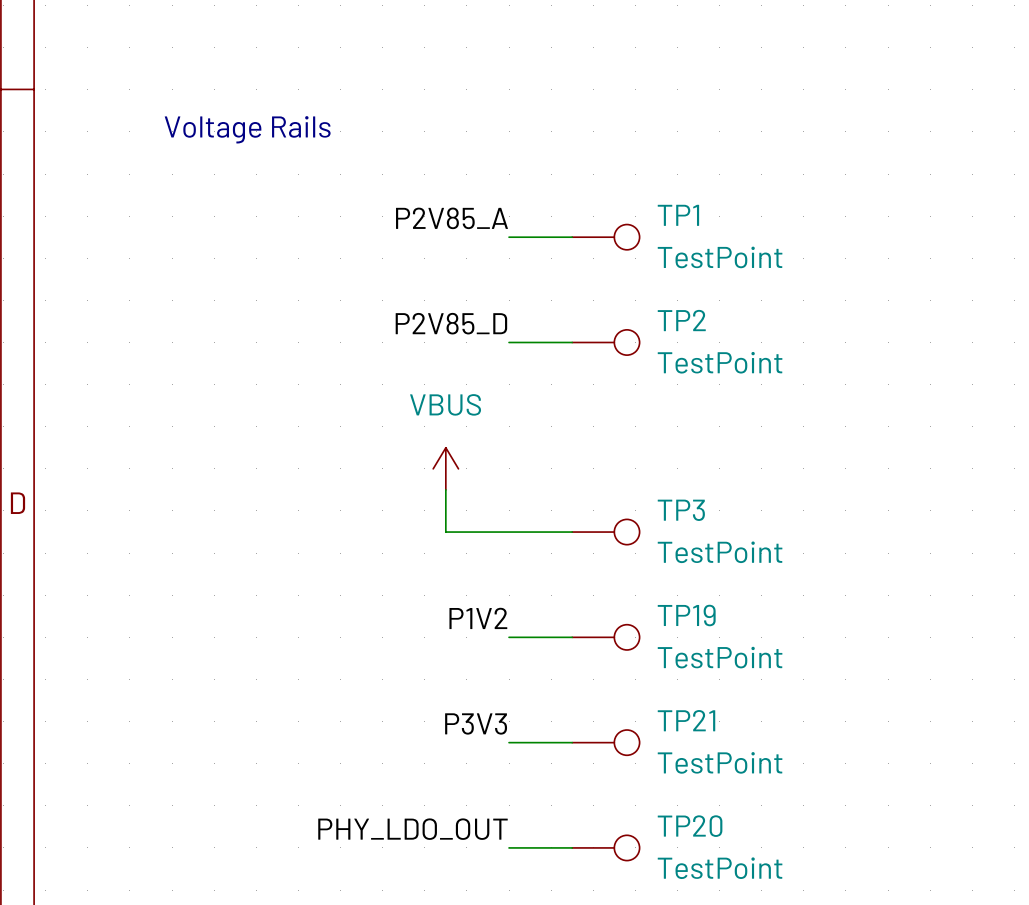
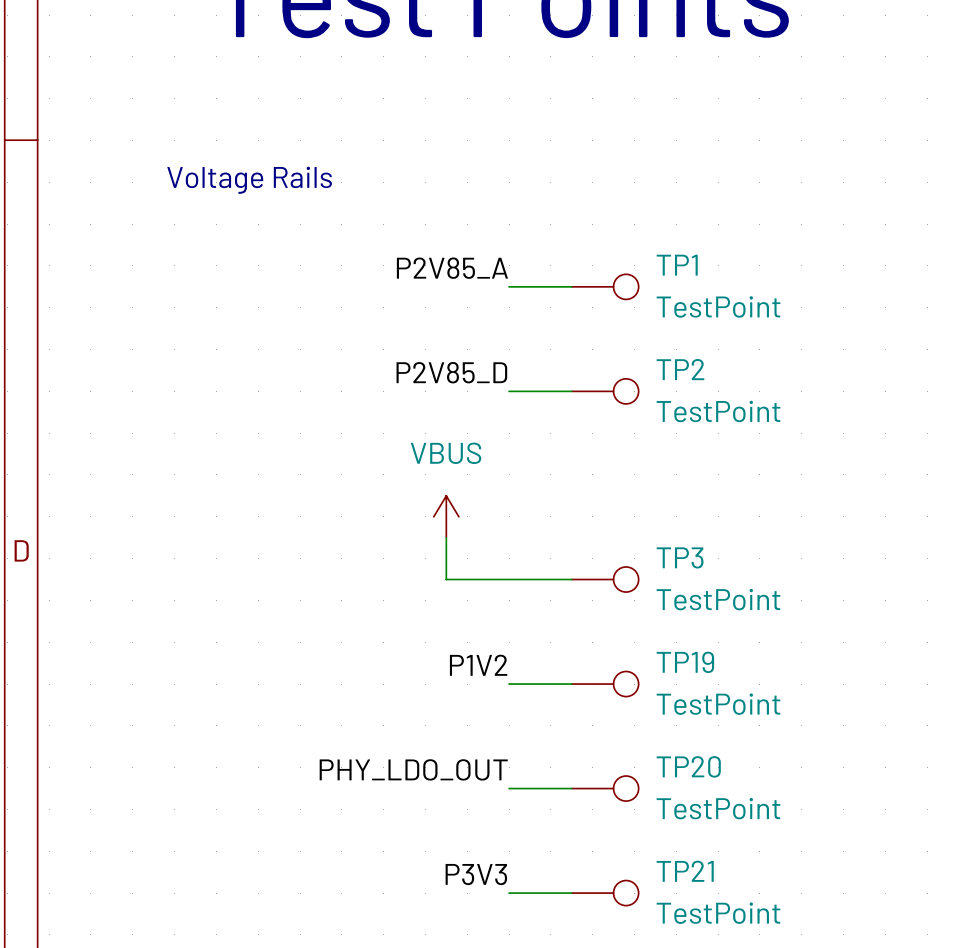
TP21 name: TP21 (686, 720) -> TP20 (688, 766)
label: P3V3 (476, 723) -> PHY_LDO_OUT (413, 769)
TP20 name: TP20 (690, 826) -> TP21 (685, 871)
label: PHY_LDO_OUT (412, 829) -> P3V3 (476, 874)

